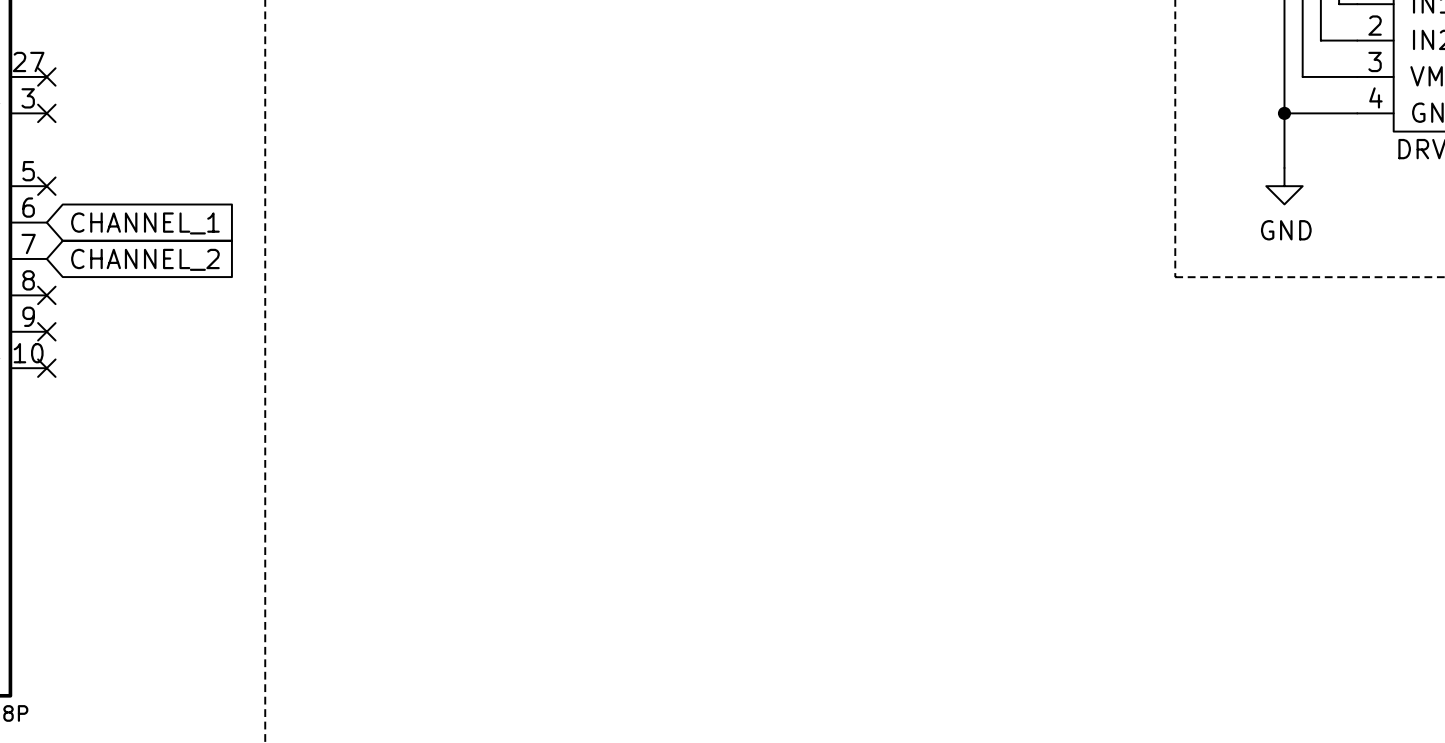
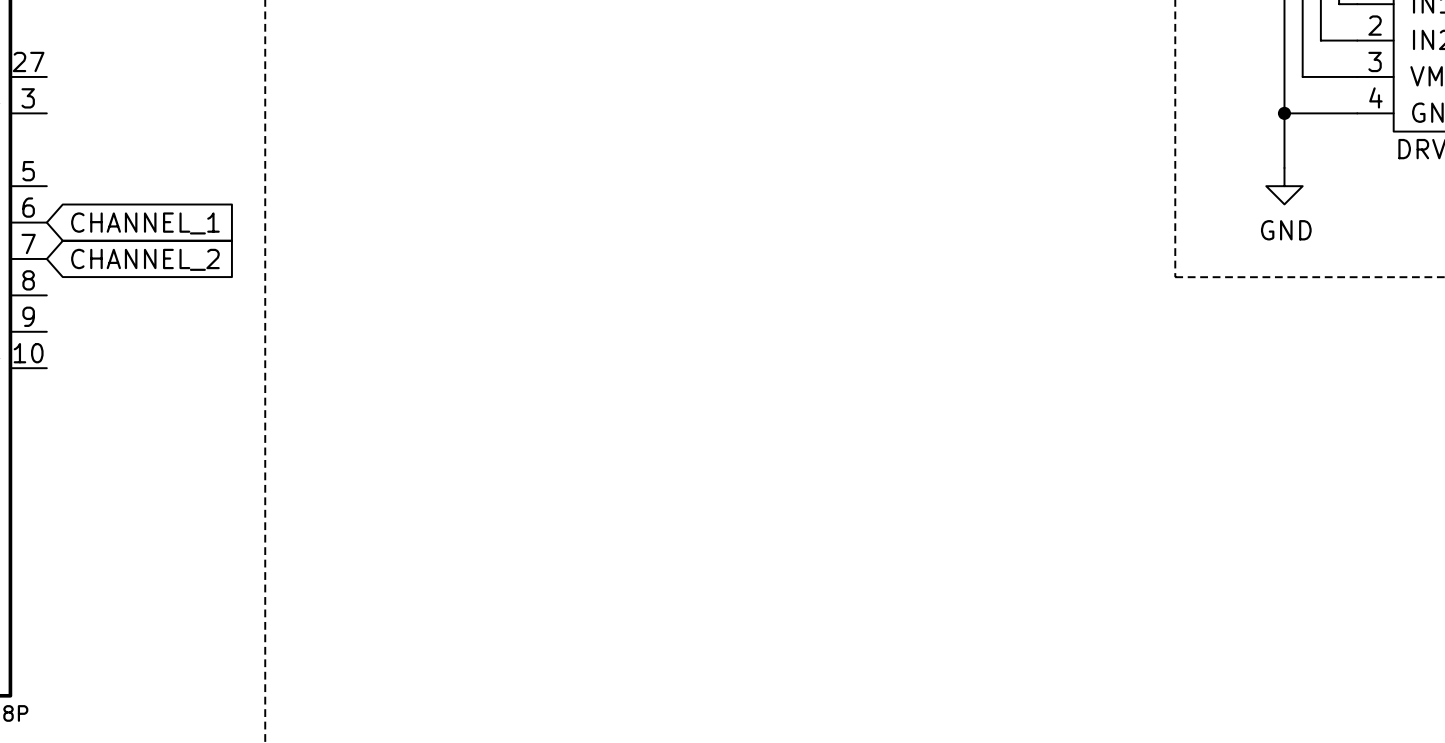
no-connect mark: (46, 76) -> none
no-connect mark: (46, 113) -> none
no-connect mark: (46, 186) -> none
no-connect mark: (46, 295) -> none
no-connect mark: (46, 331) -> none
no-connect mark: (46, 368) -> none

